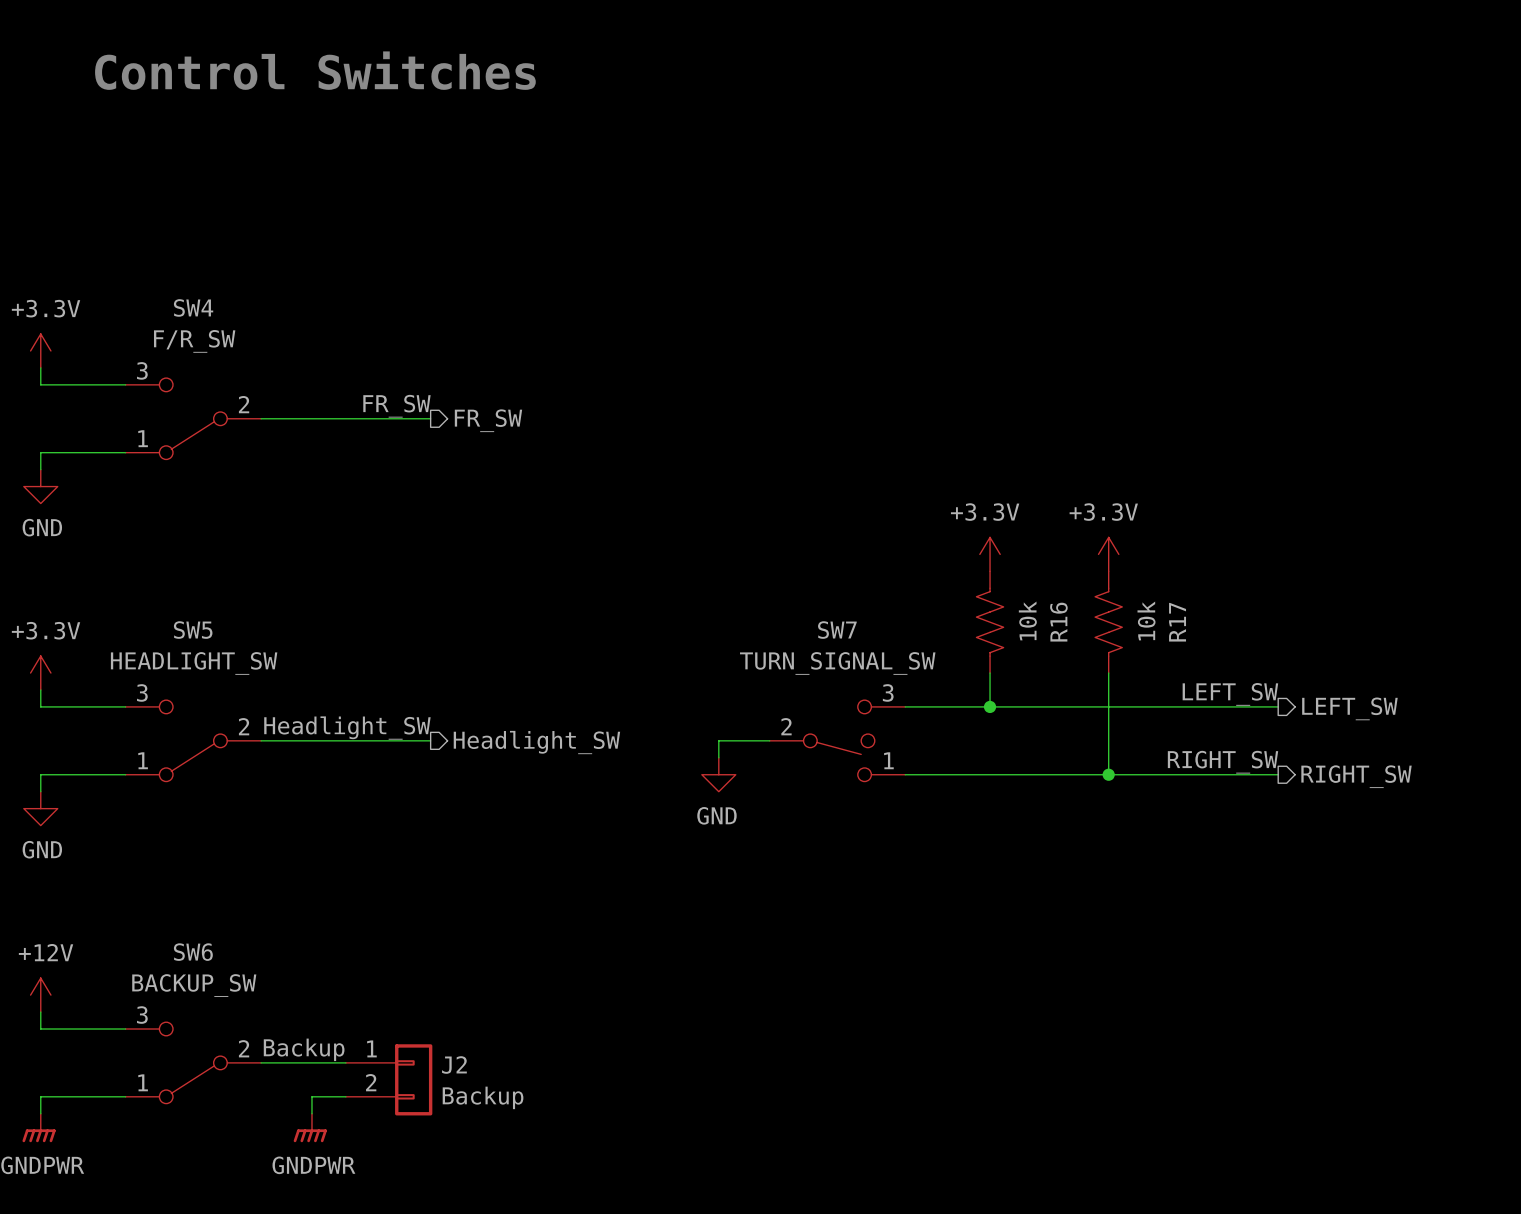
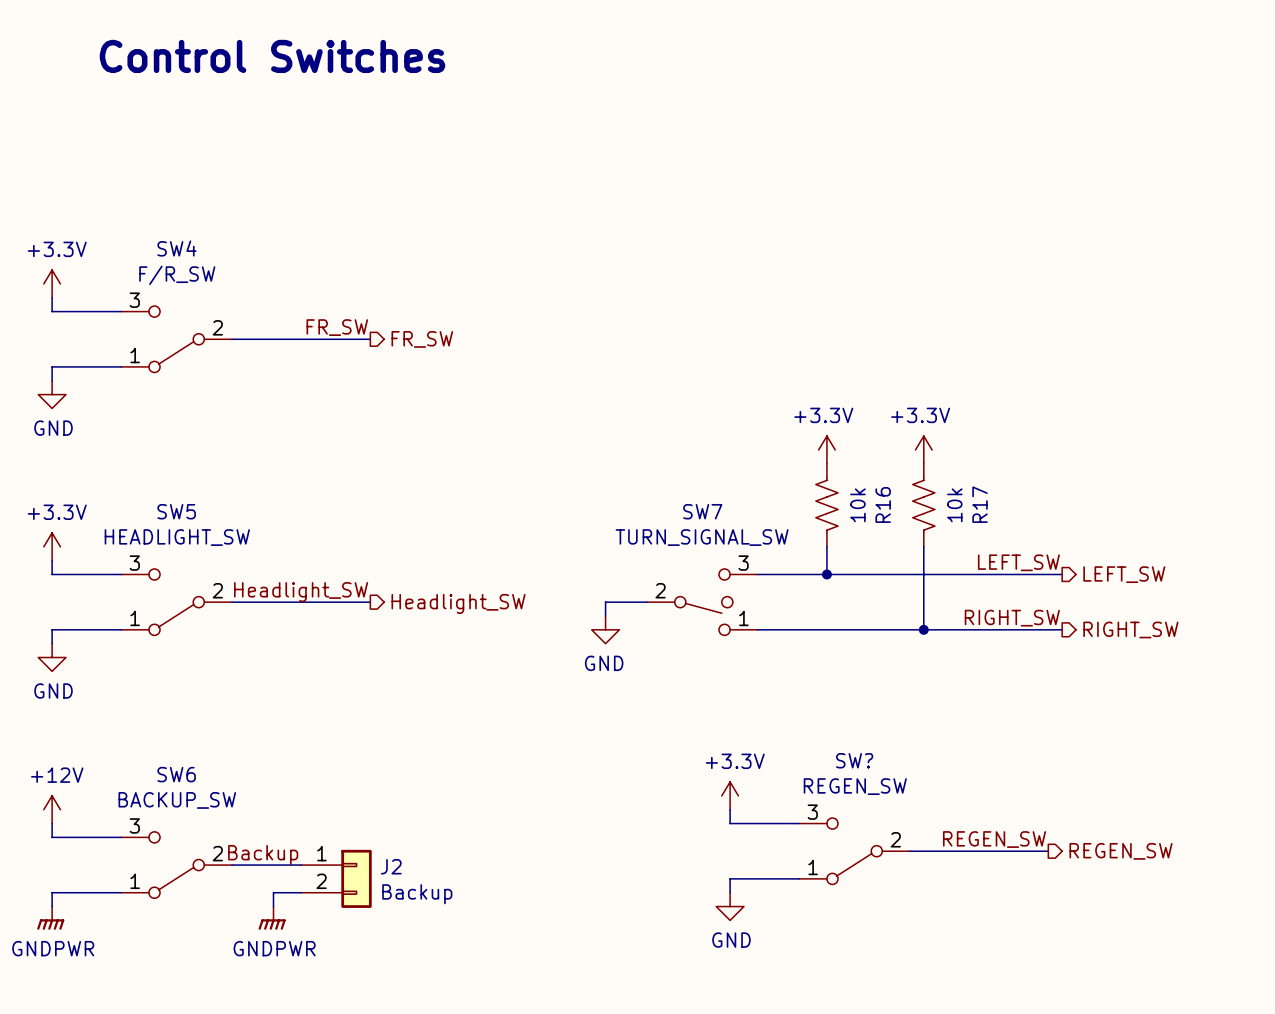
power symbol: none -> +3.3V (730, 795)
wire: none -> (730, 809) (730, 823) (799, 823)
label: none -> REGEN_SW (994, 839)
SW?: none -> REGEN_SW (854, 851)
wire: none -> (909, 851) (1048, 851)
hierarchical label: none -> REGEN_SW (1121, 851)
wire: none -> (799, 878) (730, 878) (730, 892)
power symbol: none -> GND (730, 906)

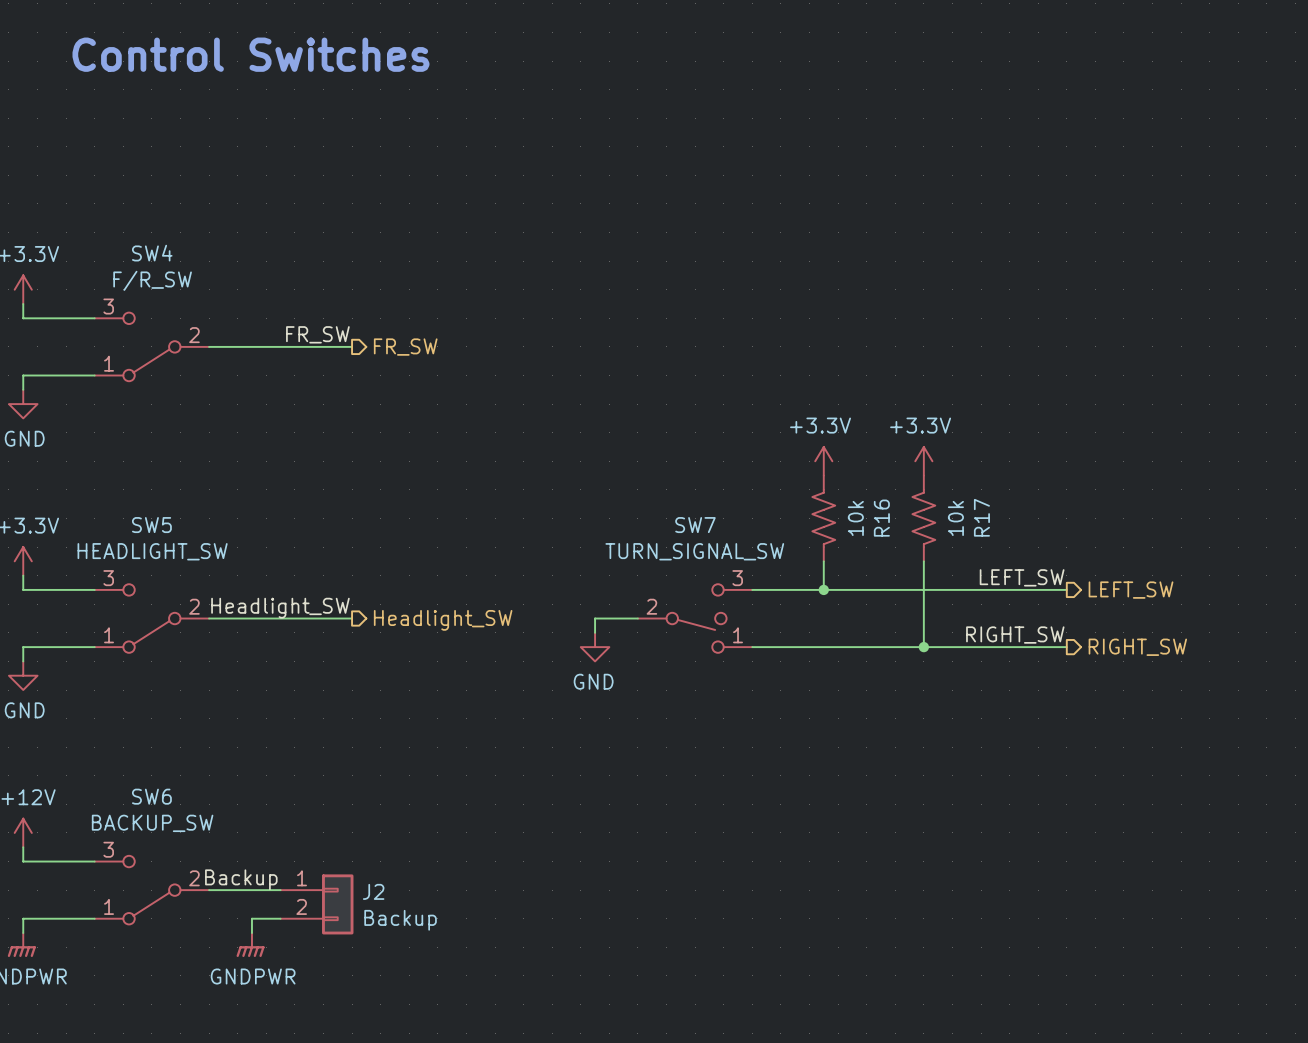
power symbol: +3.3V (730, 795) -> none
wire: (730, 809) (730, 823) (799, 823) -> none
label: REGEN_SW (994, 839) -> none
SW?: REGEN_SW (854, 851) -> none
wire: (909, 851) (1048, 851) -> none
hierarchical label: REGEN_SW (1121, 851) -> none
wire: (799, 878) (730, 878) (730, 892) -> none
power symbol: GND (730, 906) -> none

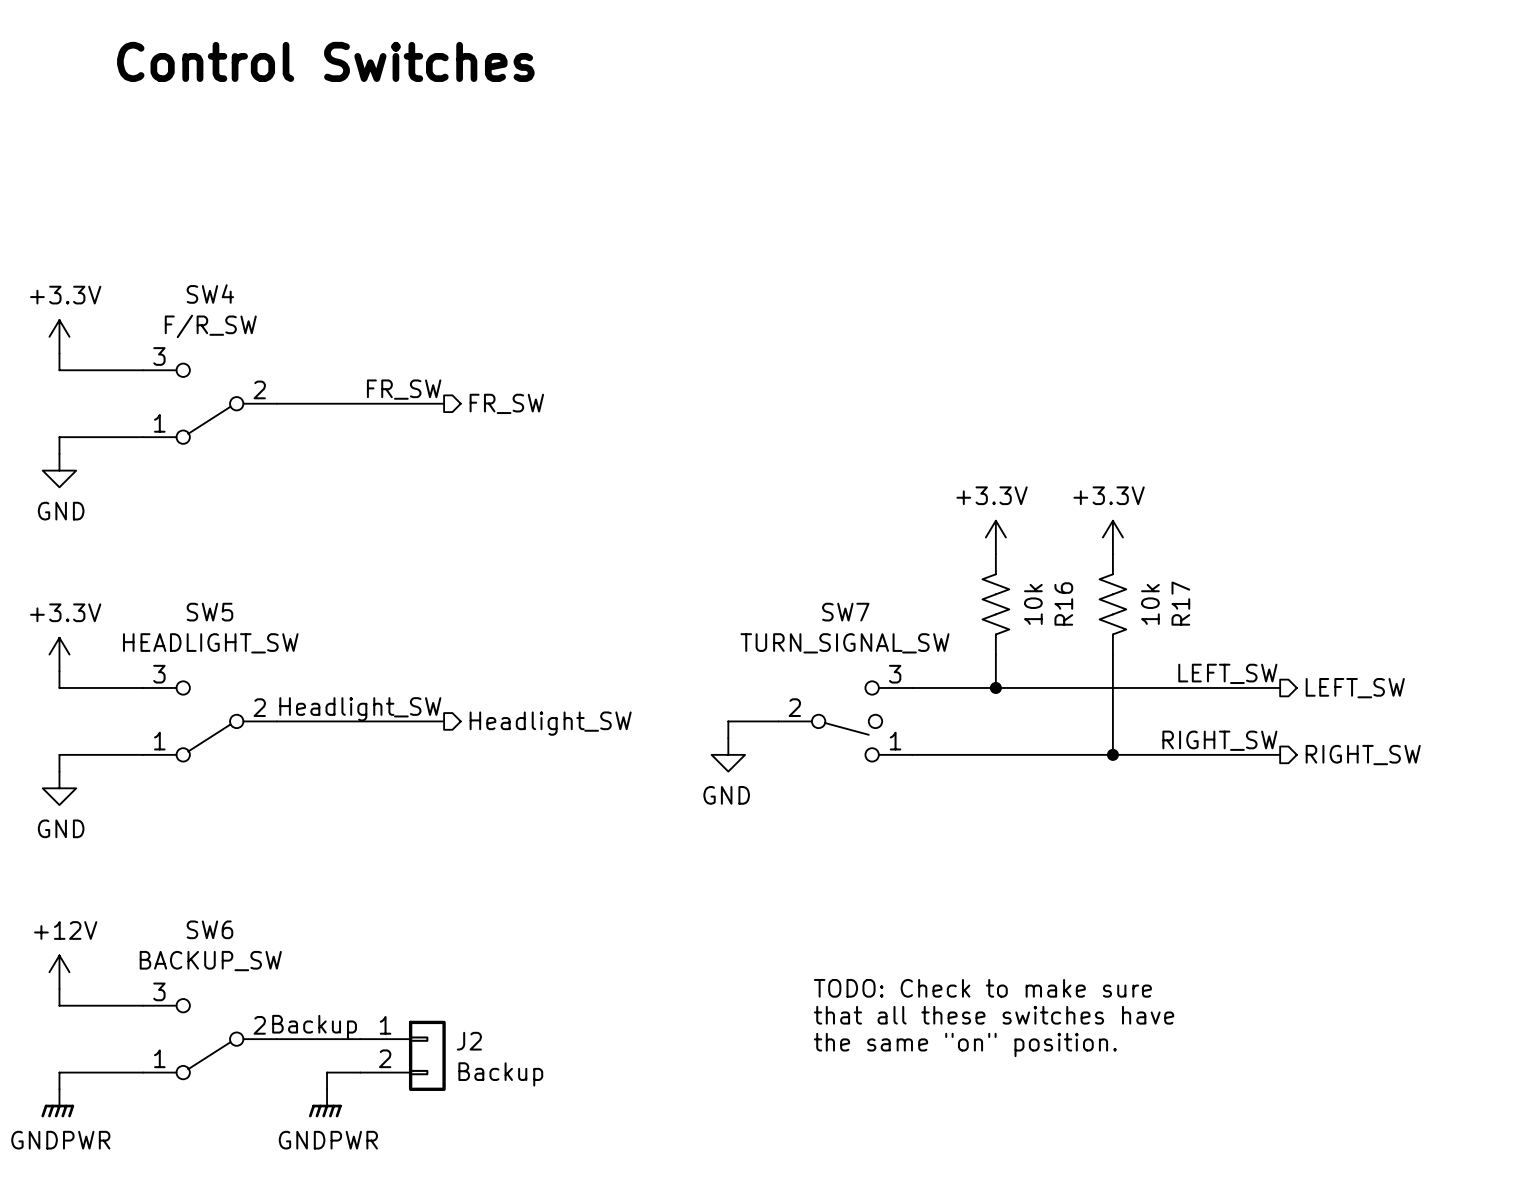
text: none -> TODO: Check to make sure (982, 988)
text: none -> that all these switches have (994, 1015)
text: none -> the same "on" position. (965, 1044)

